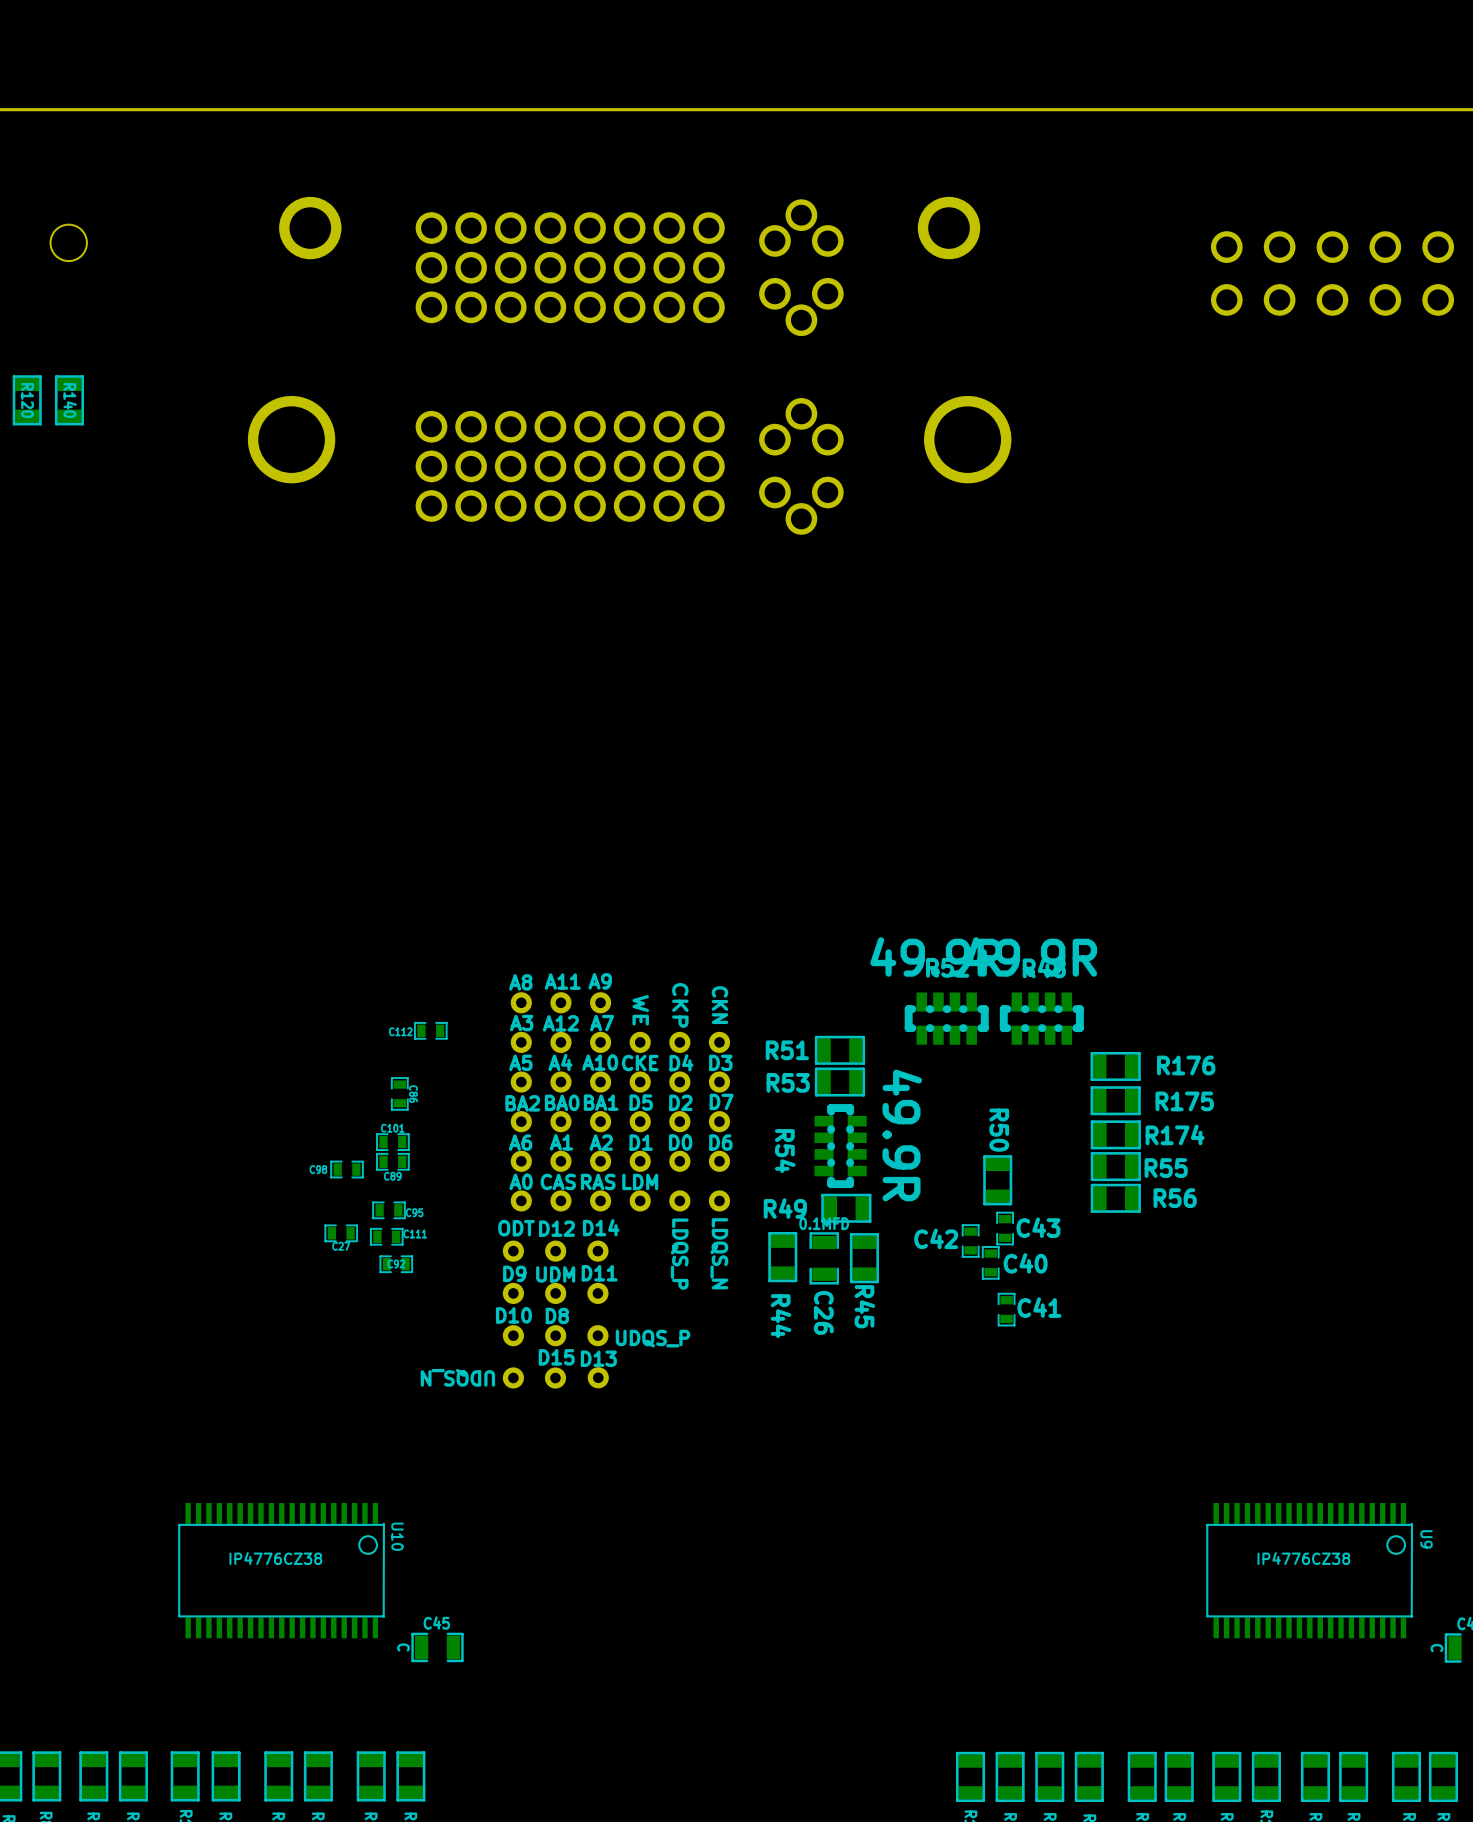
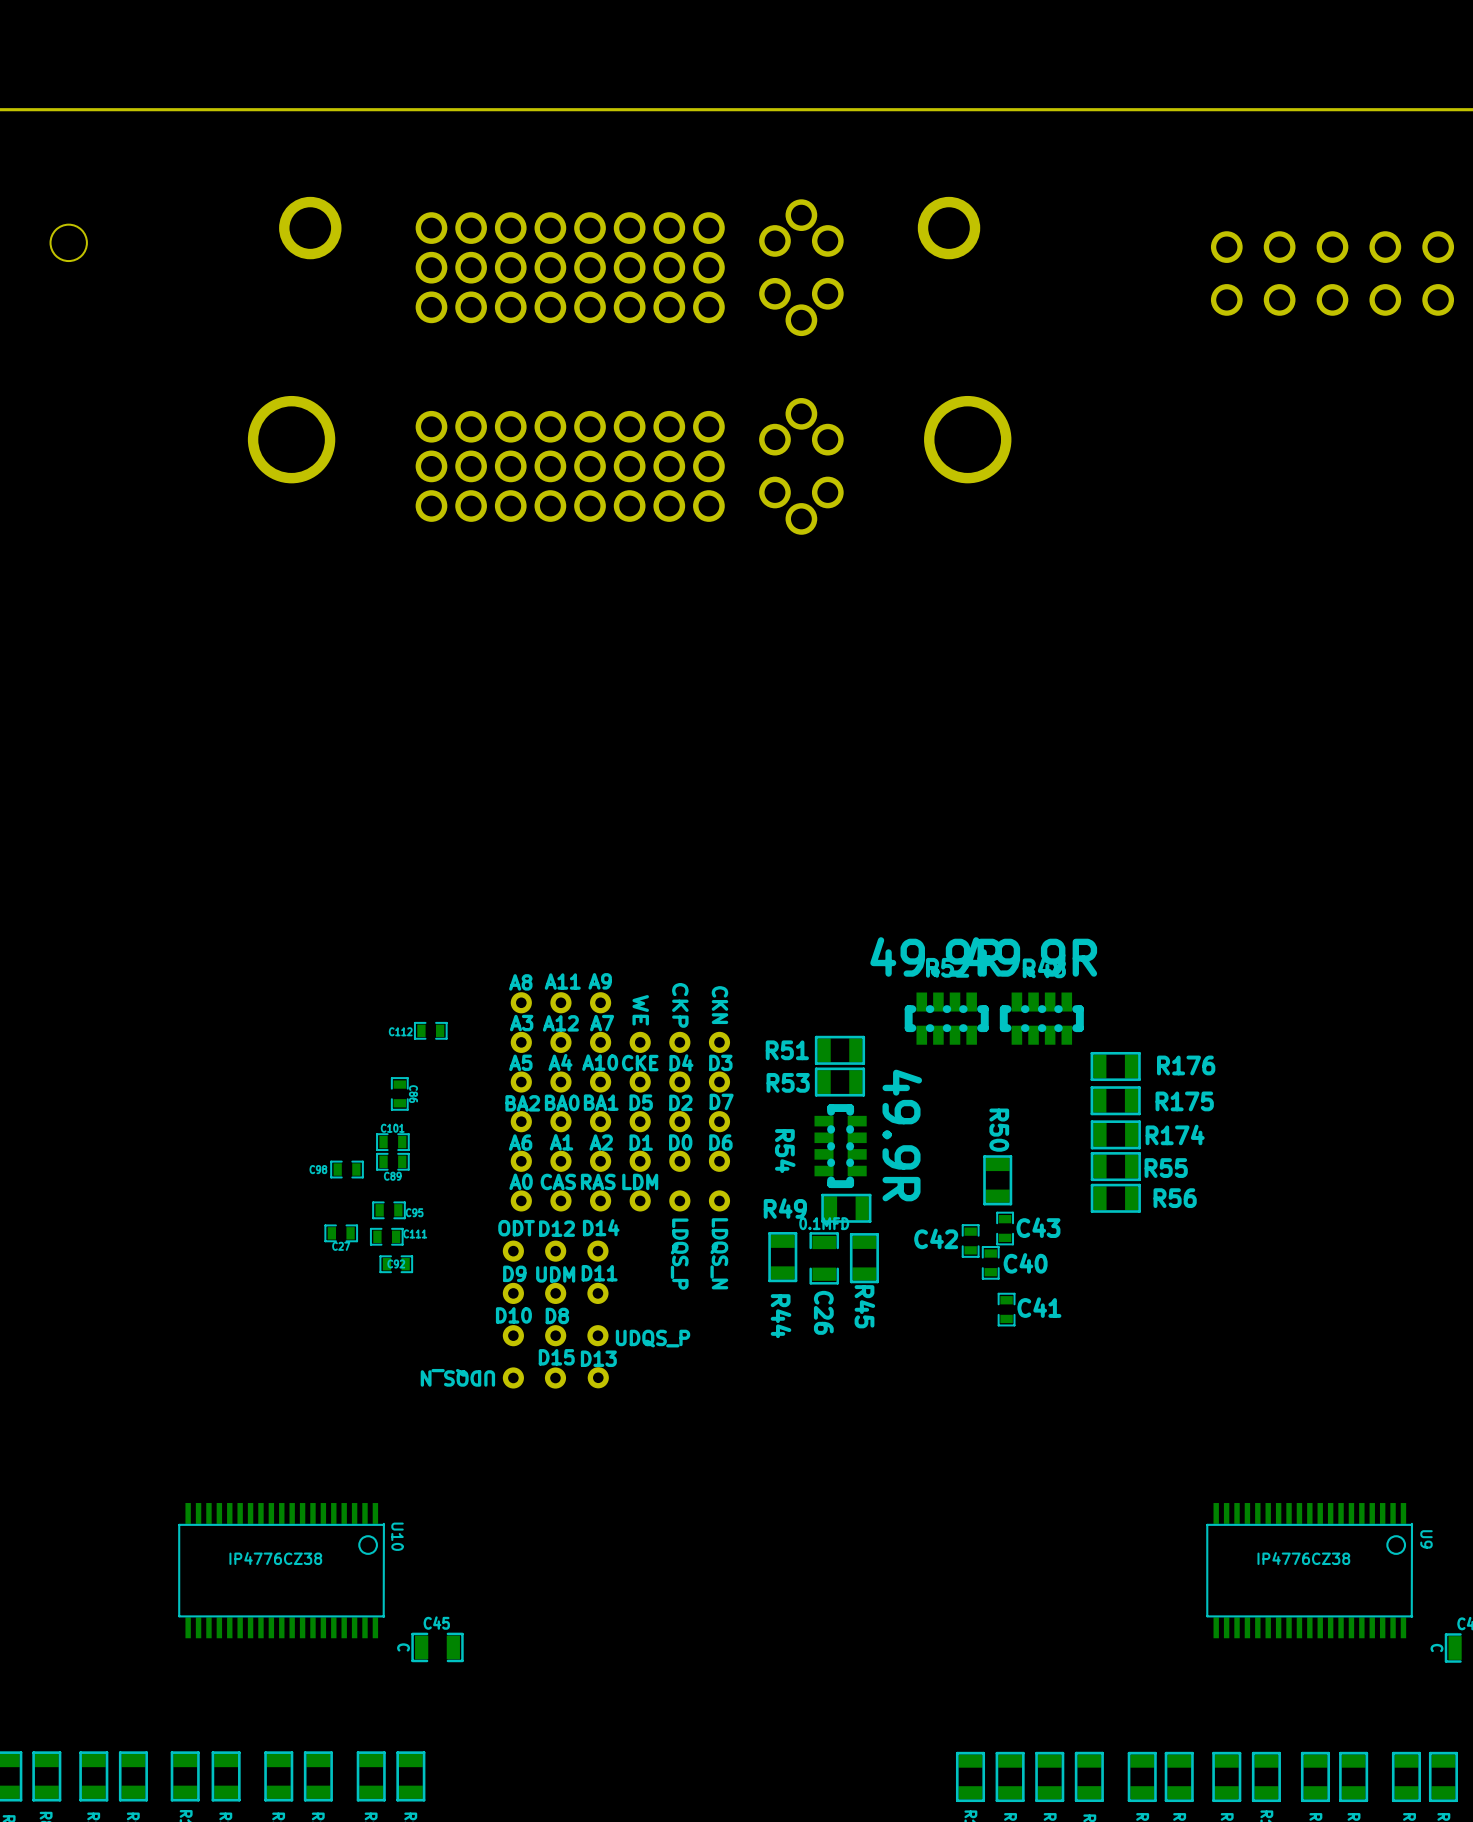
R120: (27, 400) -> none
R140: (69, 400) -> none

